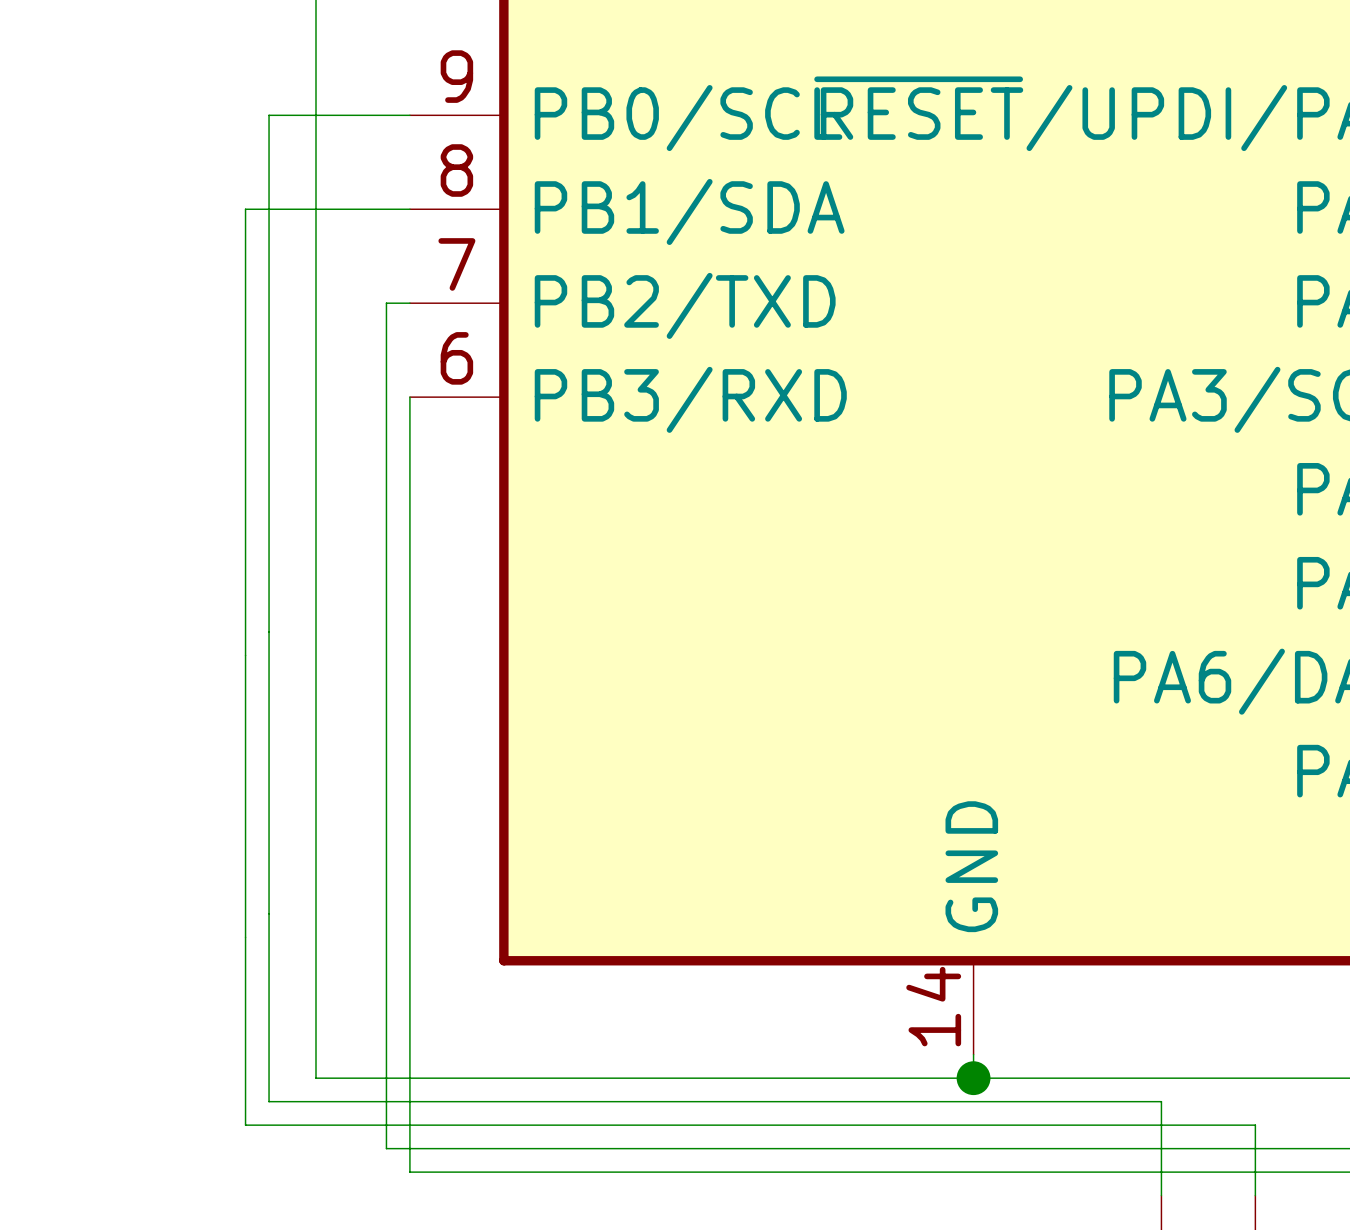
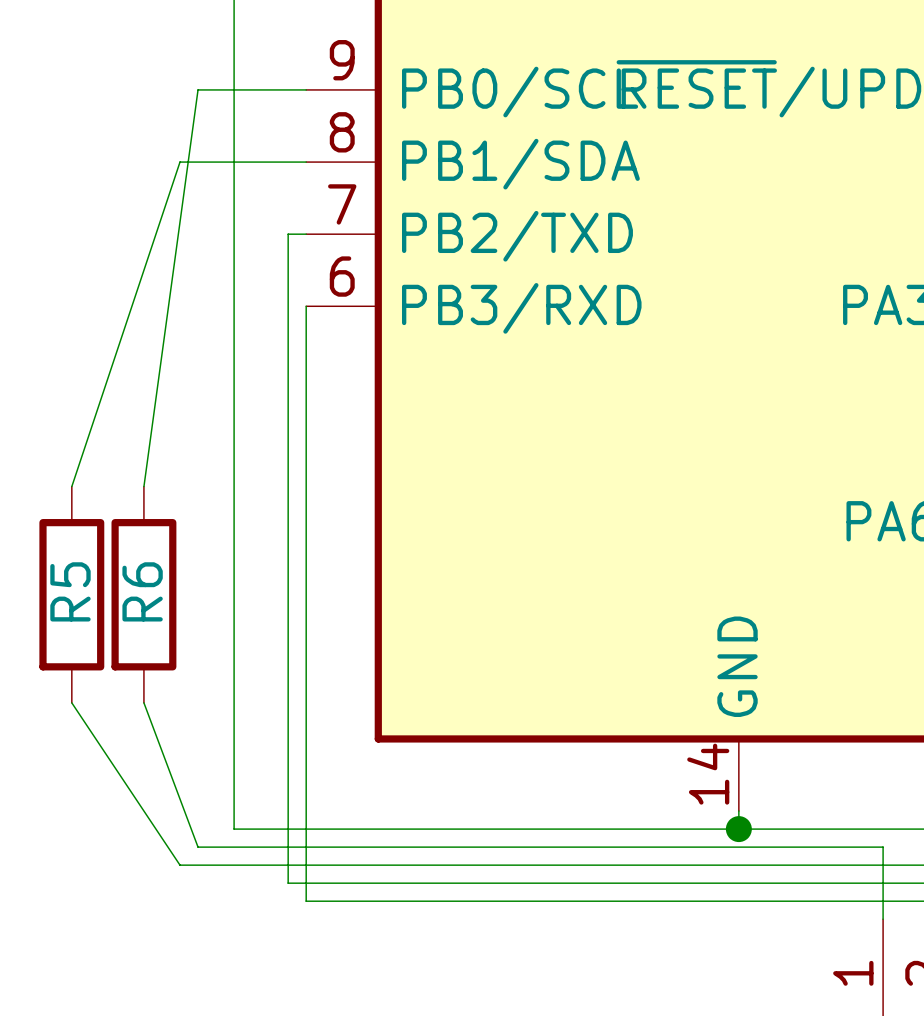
wire: (269, 115) (269, 1101) -> (198, 89) (143, 486)
wire: (245, 209) (245, 1125) -> (180, 162) (71, 486)
R5: none -> (71, 594)
R6: none -> (143, 594)
wire: none -> (71, 702) (180, 865)
wire: none -> (143, 702) (198, 847)

